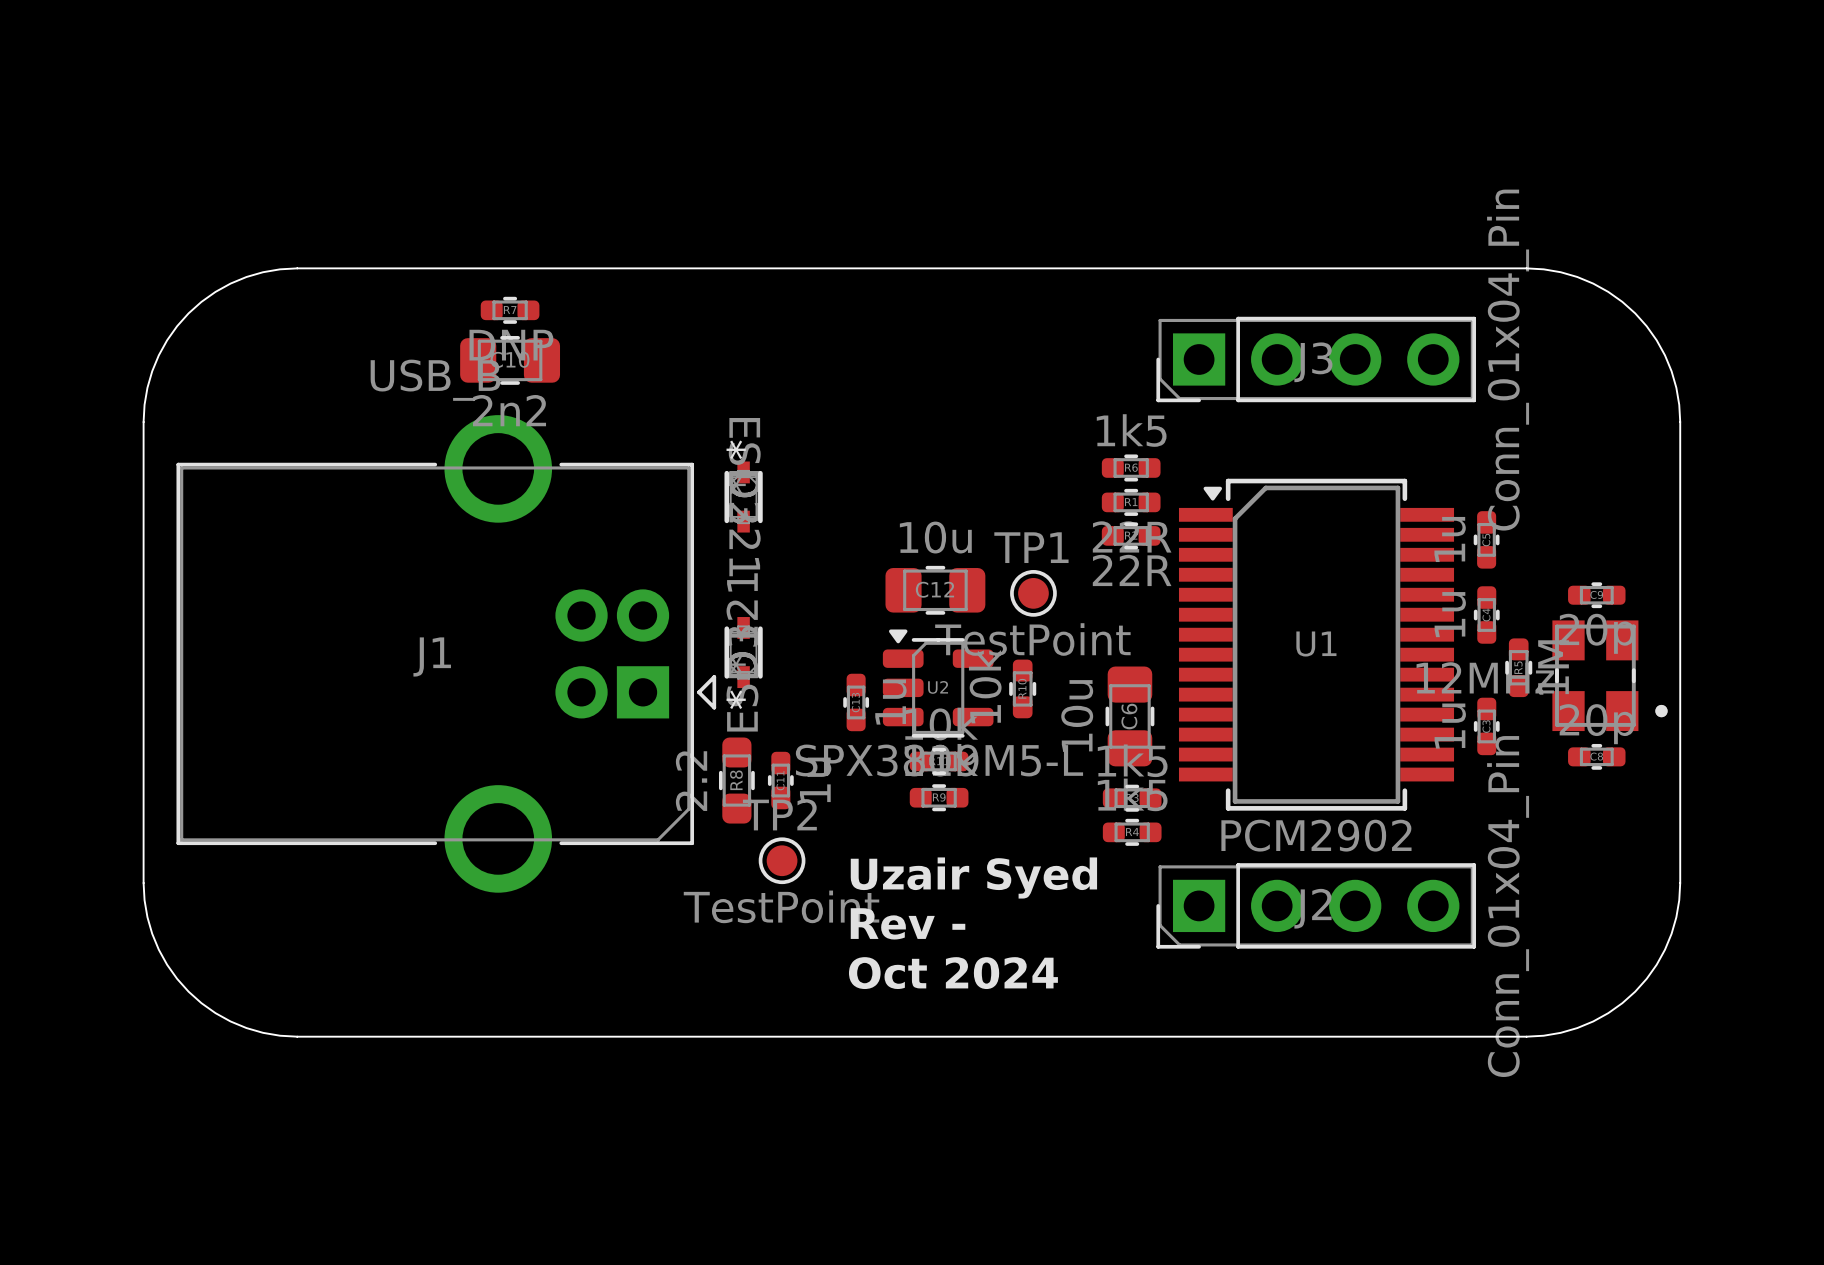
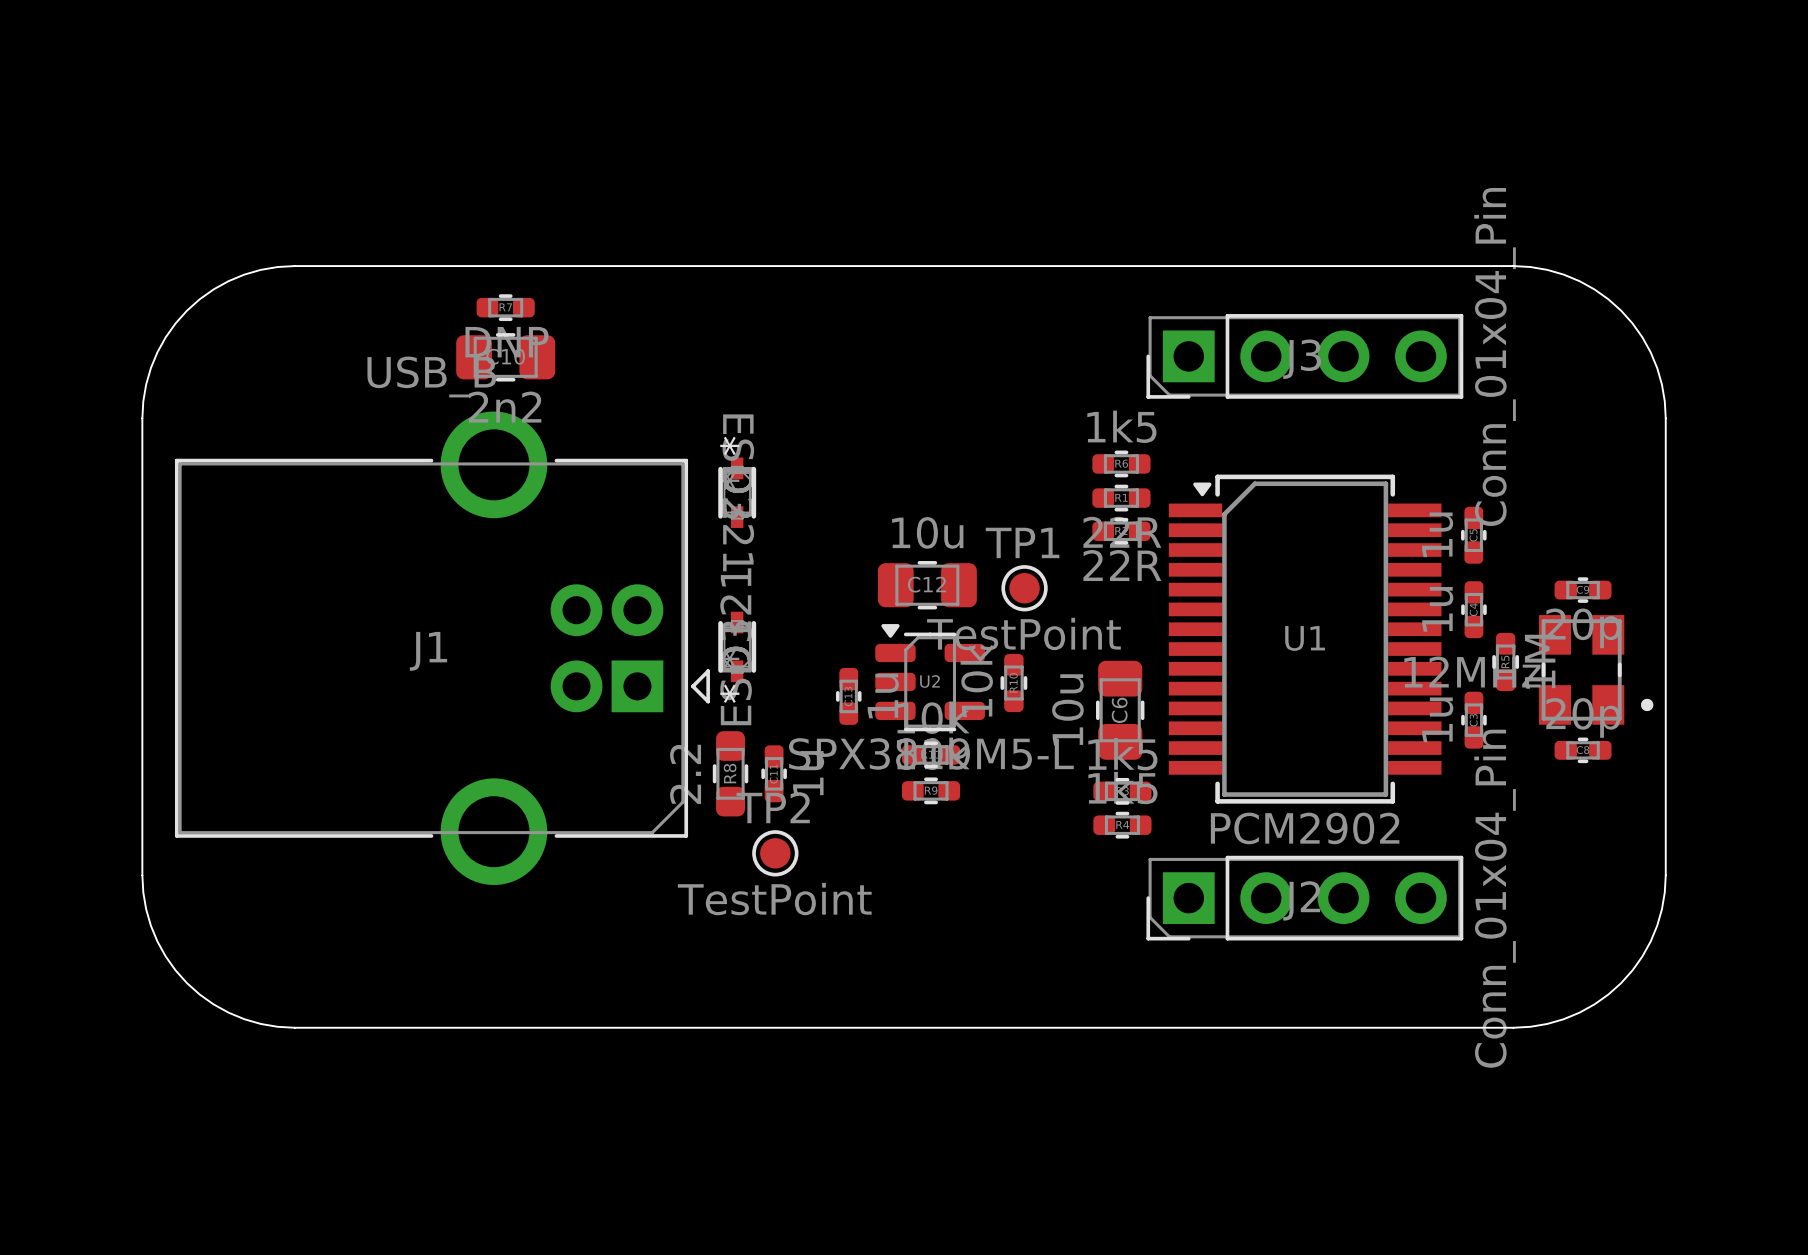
text: Uzair Syed (973, 877) -> none
text: Rev - (908, 923) -> none
text: Oct 2024 (953, 973) -> none

